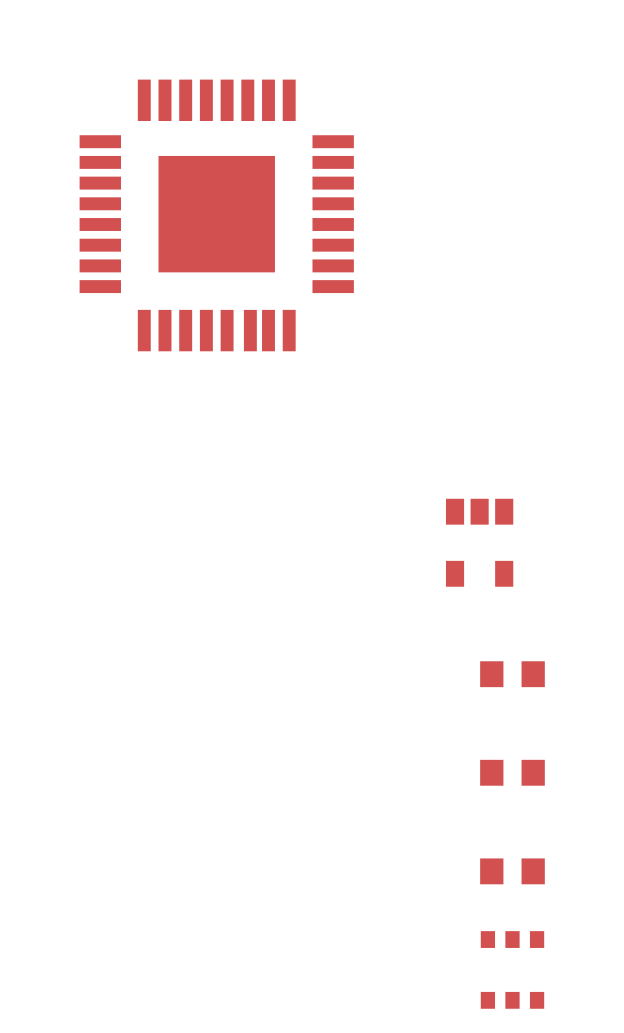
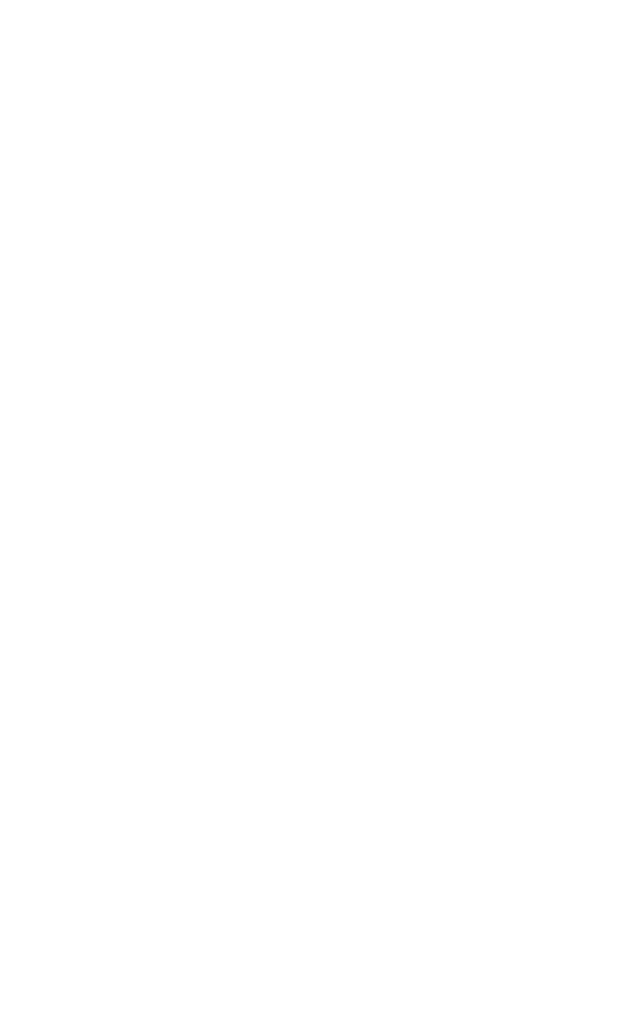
part: (216, 215) -> none
part: (479, 542) -> none
part: (512, 674) -> none
part: (512, 772) -> none
part: (512, 871) -> none
part: (512, 969) -> none

